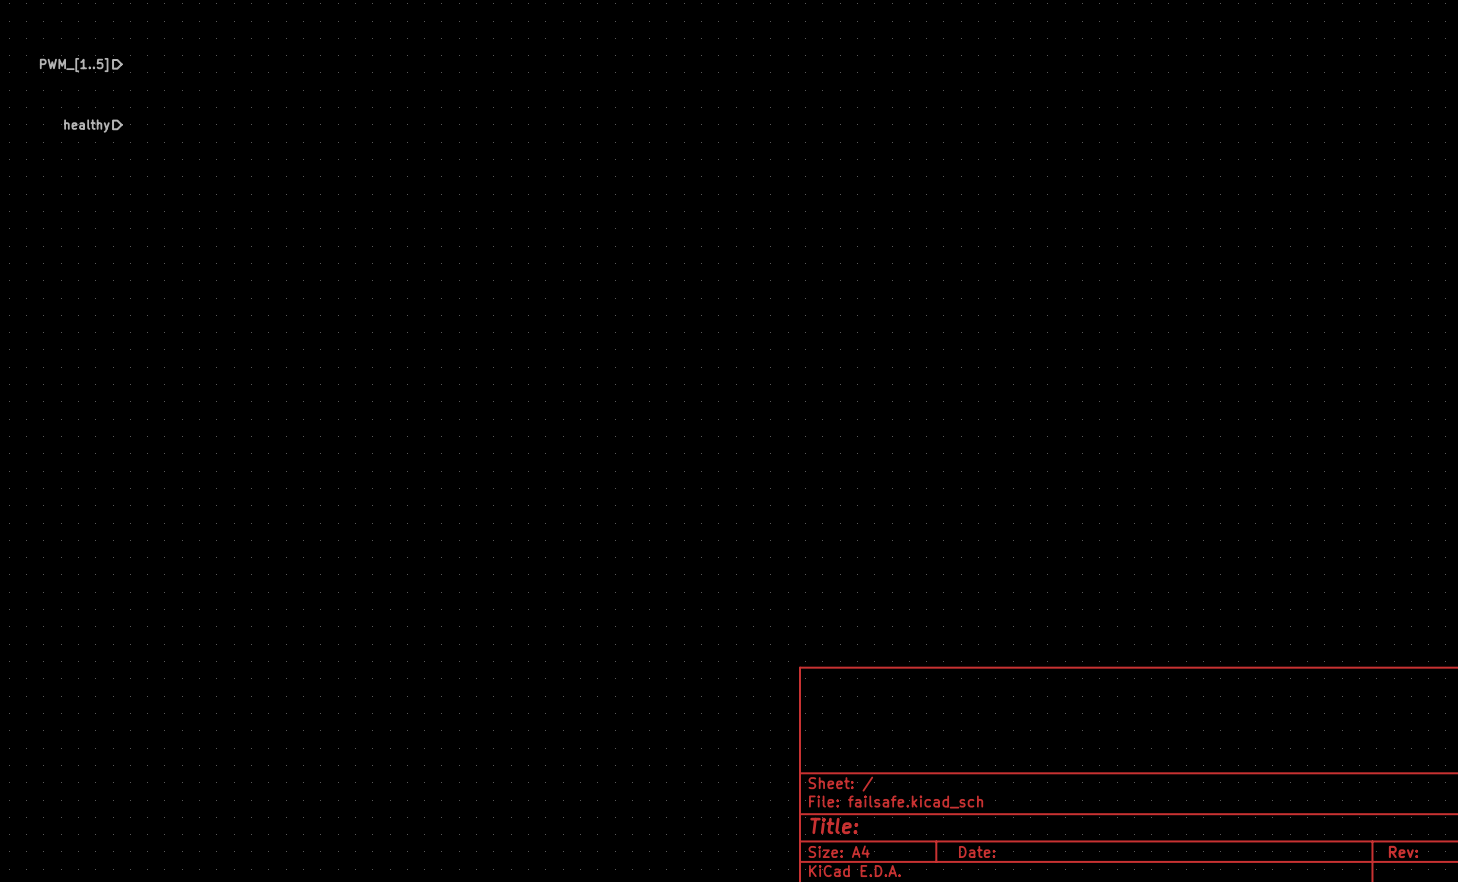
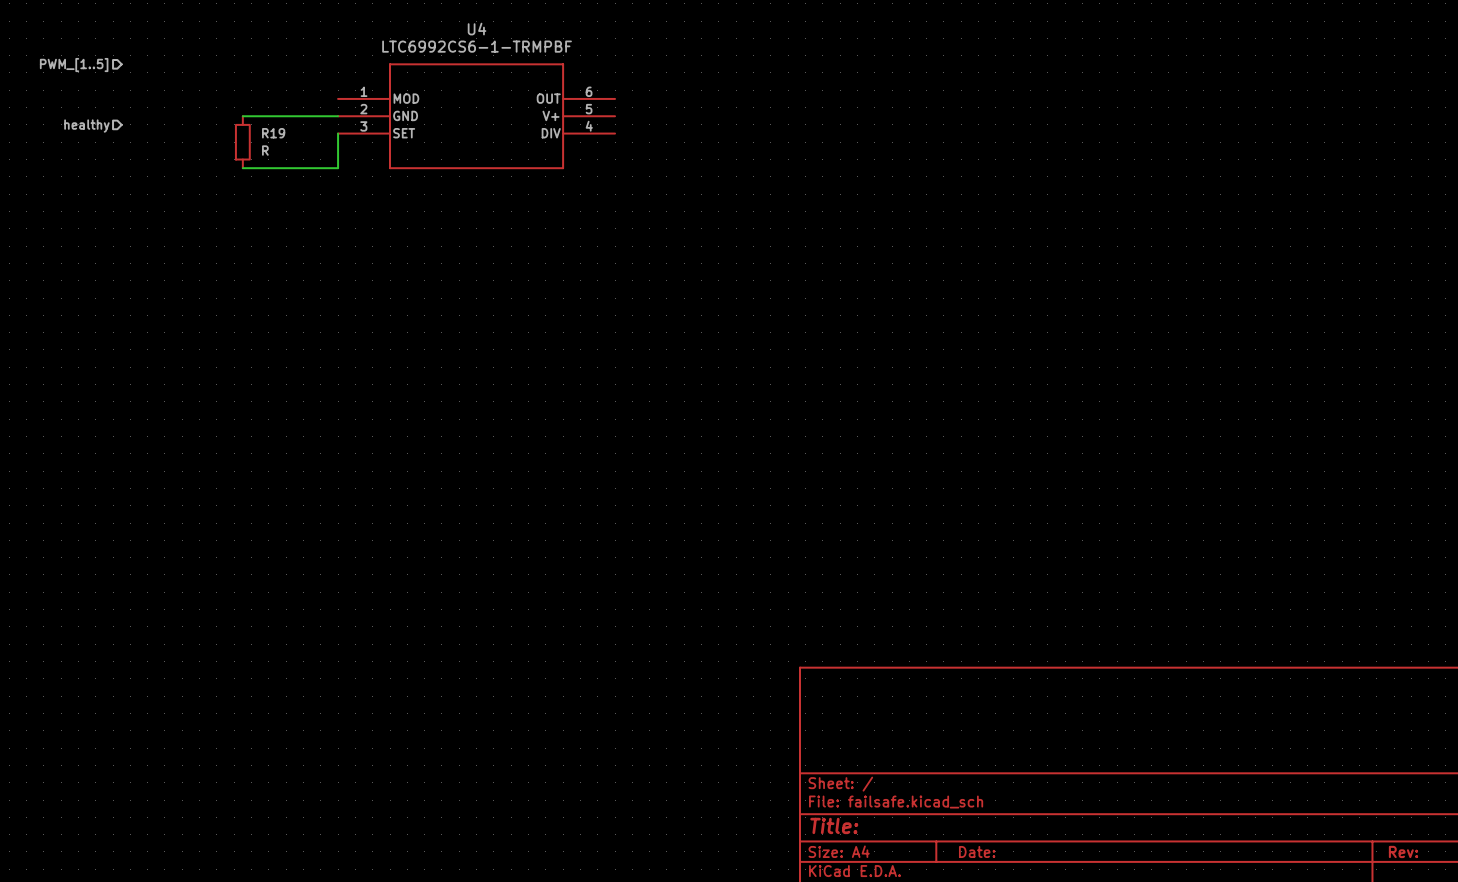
wire: none -> (242, 116) (338, 116)
U4: none -> LTC6992CS6-1-TRMPBF (476, 116)
wire: none -> (338, 133) (338, 168) (242, 168)
R19: none -> R (242, 142)

